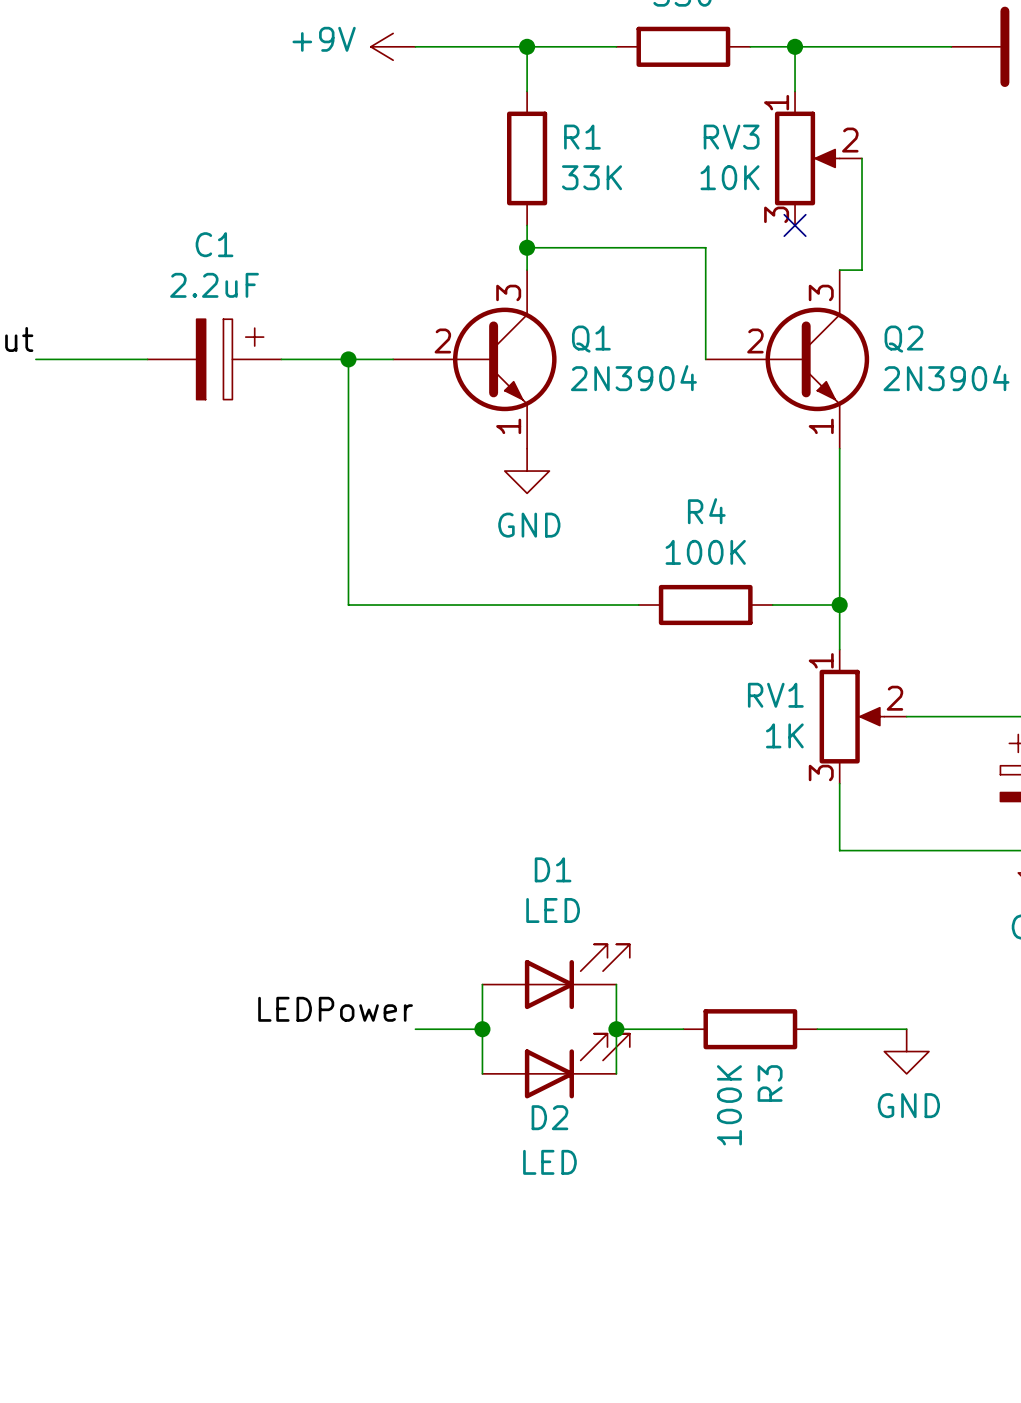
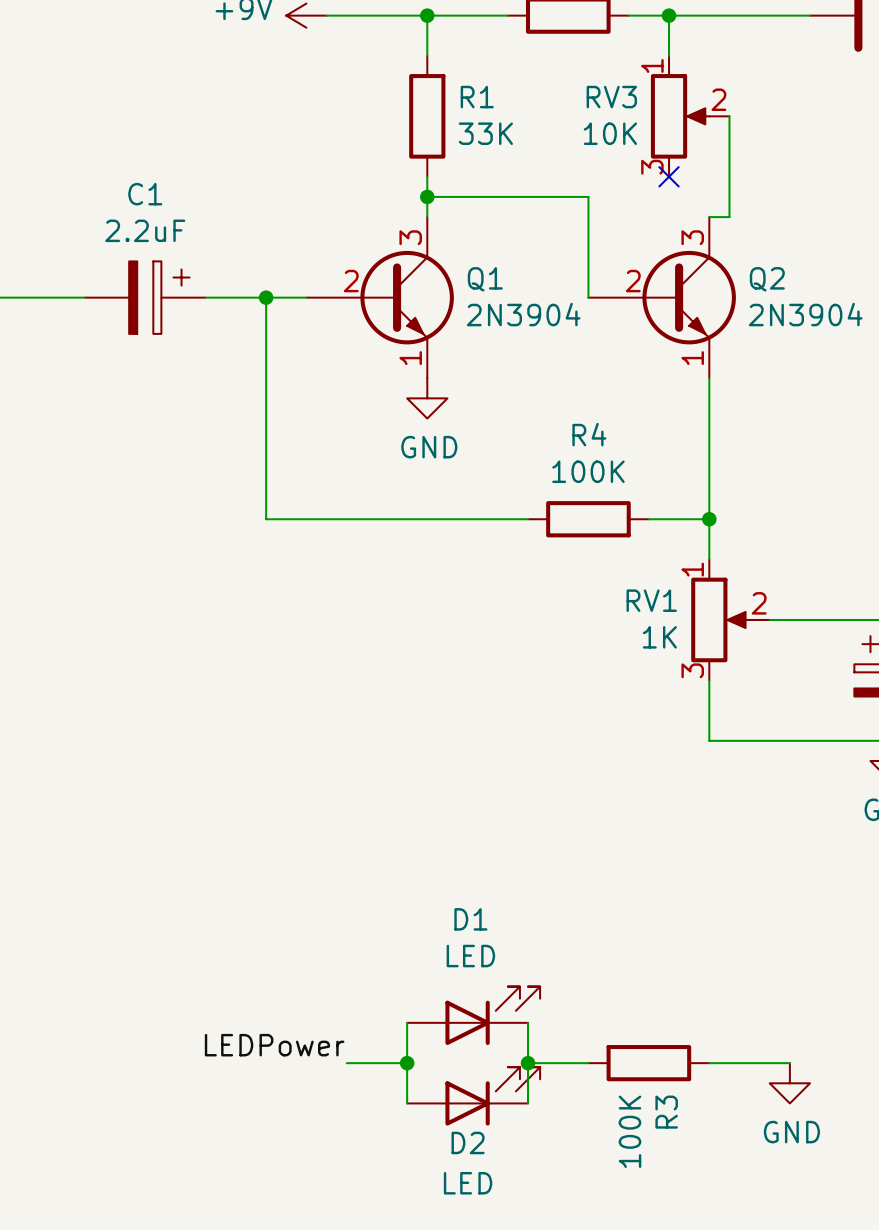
D1 position: (556, 976) -> (473, 1015)
wire: (482, 984) (482, 1073) -> (407, 1022) (407, 1103)
wire: (616, 984) (616, 1073) -> (528, 1022) (528, 1103)
label position: LEDPower (335, 1009) -> LEDPower (274, 1045)
wire: (415, 1029) (482, 1029) -> (346, 1063) (407, 1063)
junction: (482, 1029) -> none
wire: (616, 1029) (683, 1029) -> (528, 1063) (588, 1063)
junction: (616, 1029) -> none
R3 position: (750, 1029) -> (648, 1063)
wire: (817, 1029) (906, 1029) -> (709, 1063) (789, 1063)
power symbol position: GND (906, 1051) -> GND (789, 1083)
D2 position: (556, 1066) -> (473, 1096)
junction: none -> (407, 1063)
junction: none -> (528, 1063)

